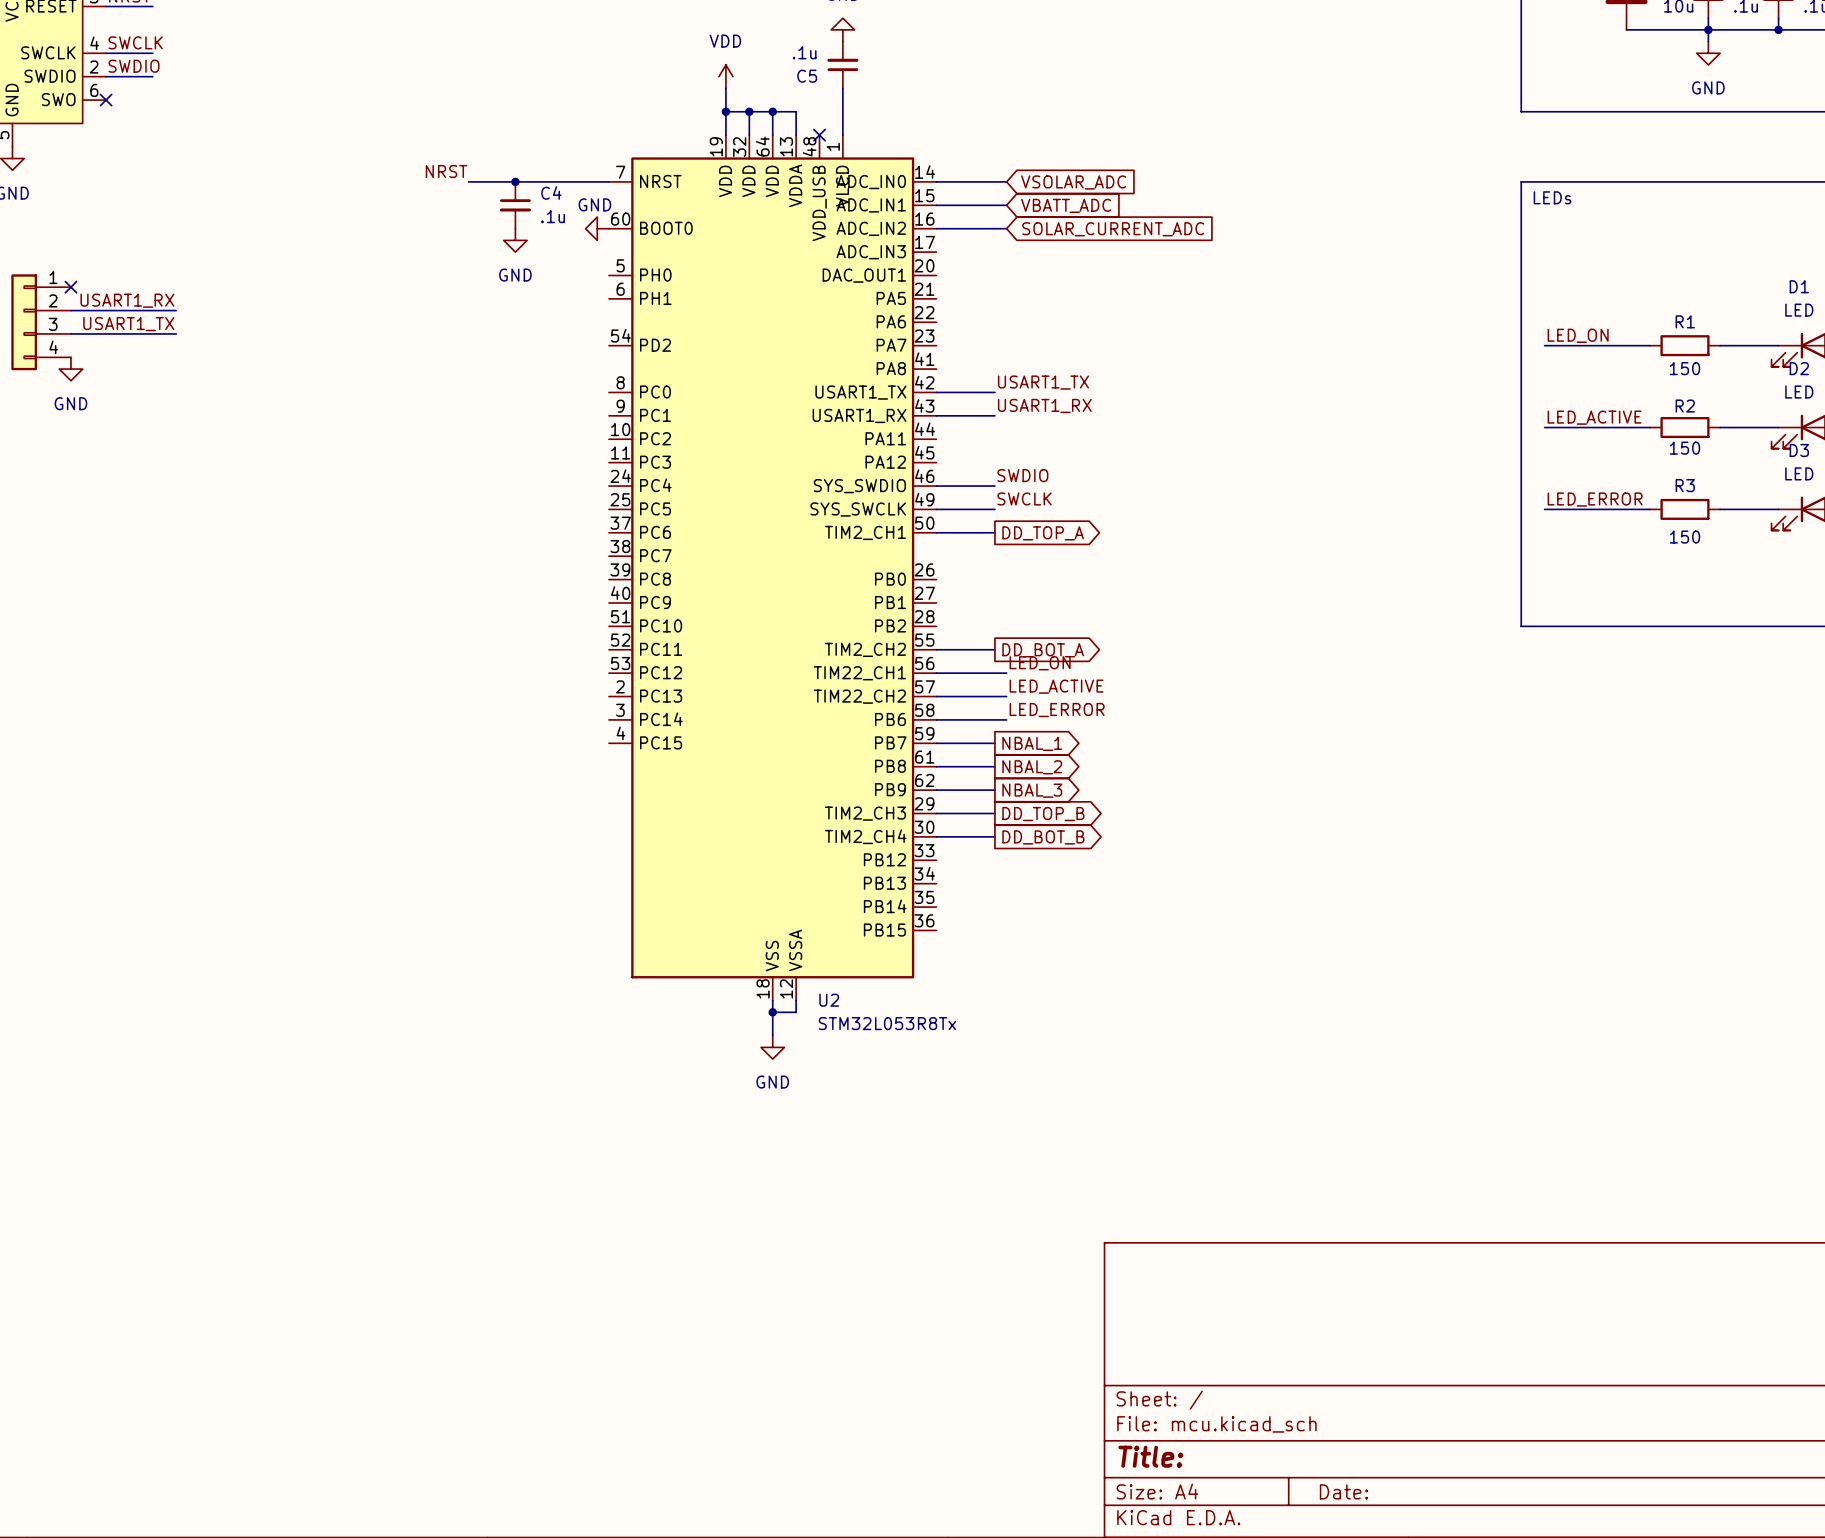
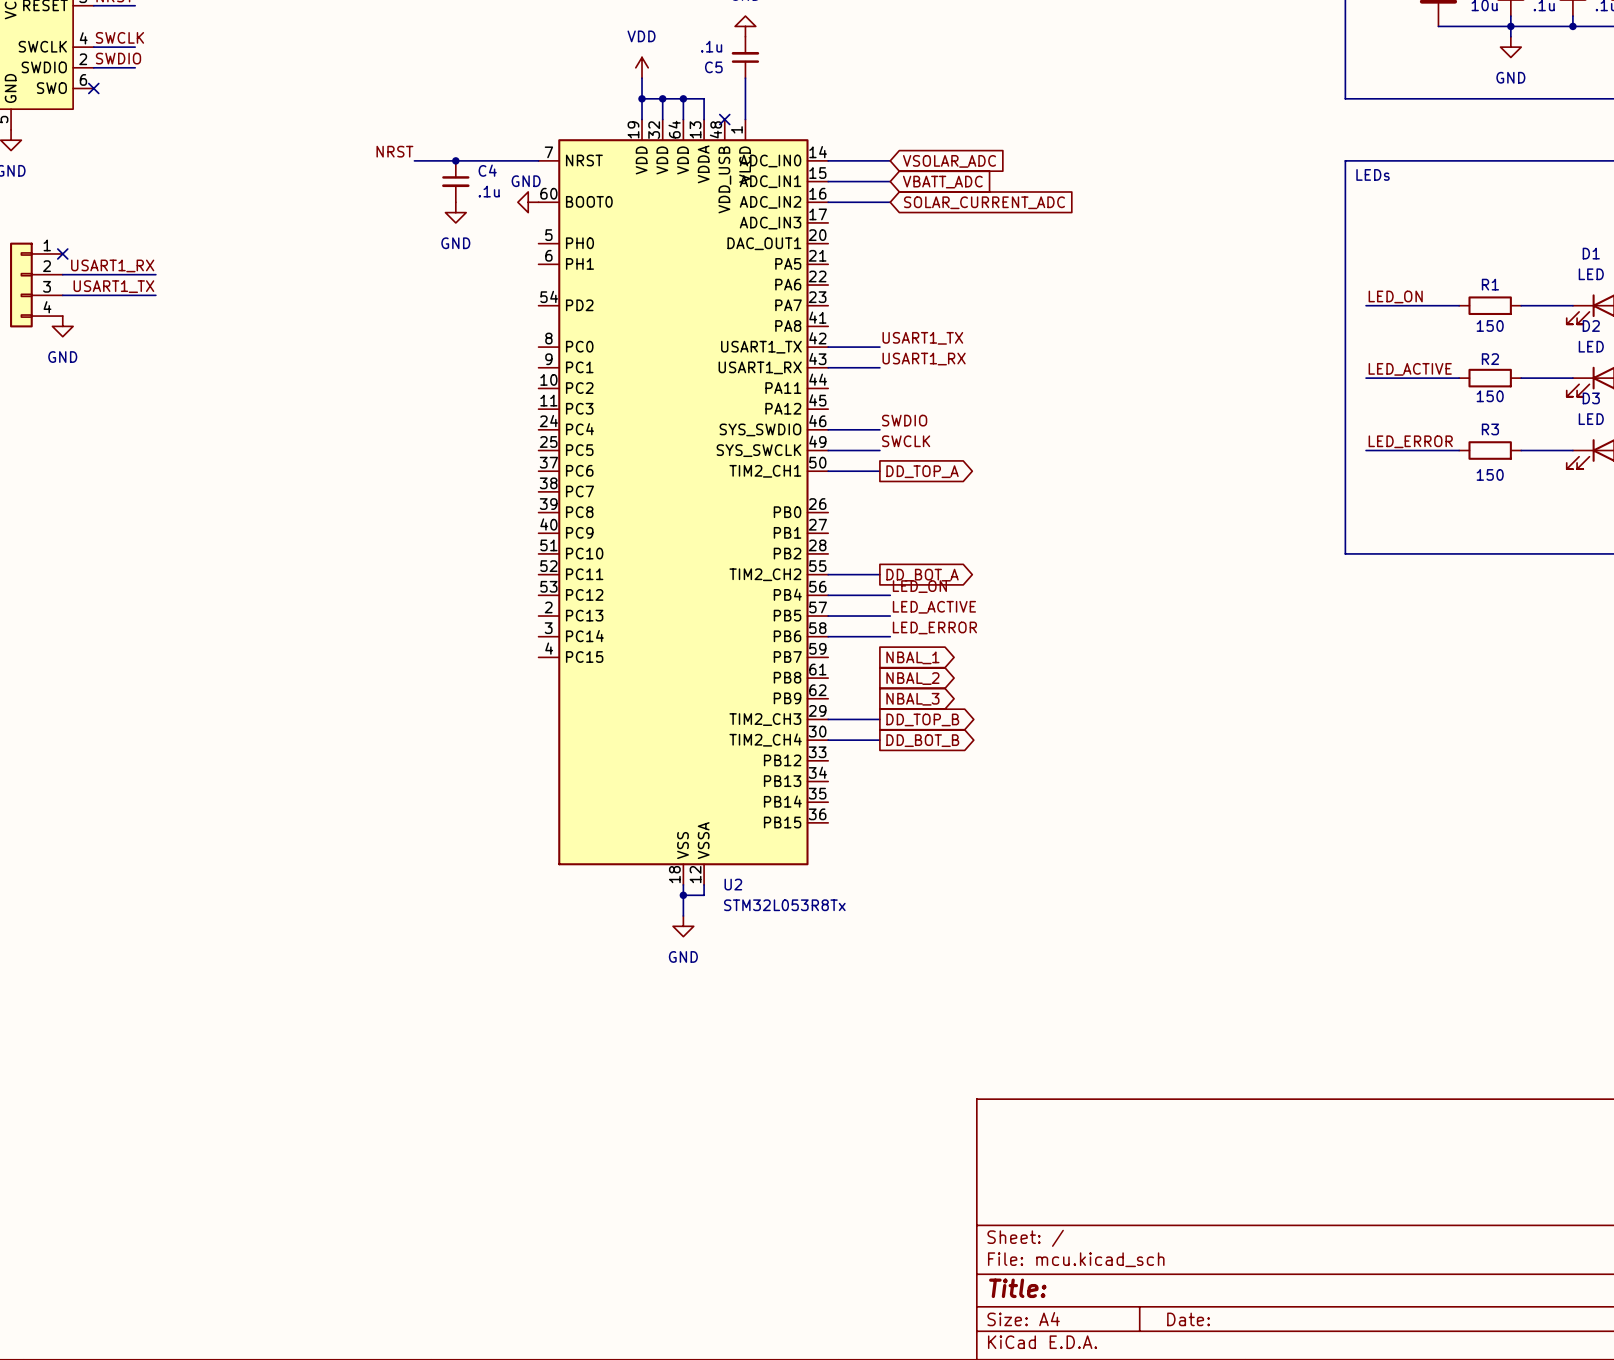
U2 pin name: TIM22_CH1 (859, 673) -> PB4 (787, 594)
U2 pin name: TIM22_CH2 (859, 696) -> PB5 (787, 615)
wire: (936, 743) (994, 743) -> none
wire: (936, 766) (994, 766) -> none
wire: (936, 790) (994, 790) -> none

